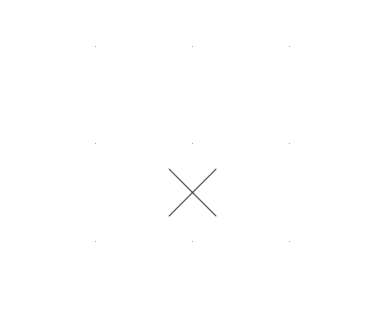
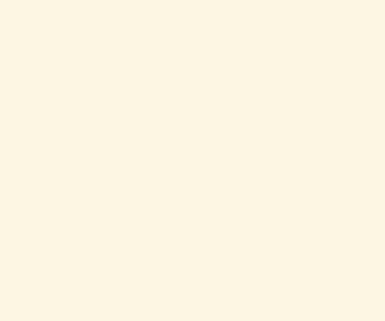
no-connect mark: (192, 192) -> none

